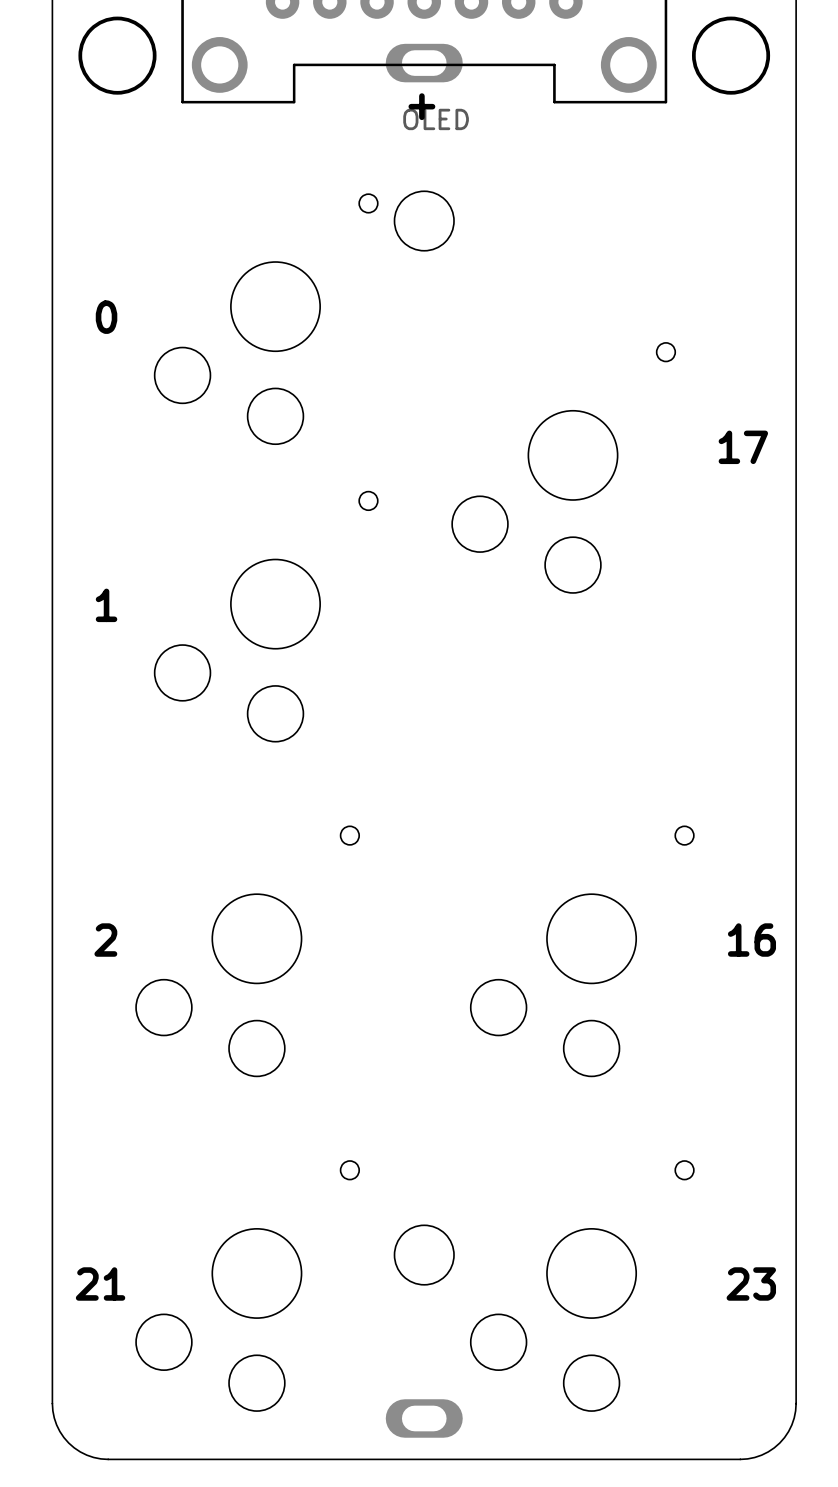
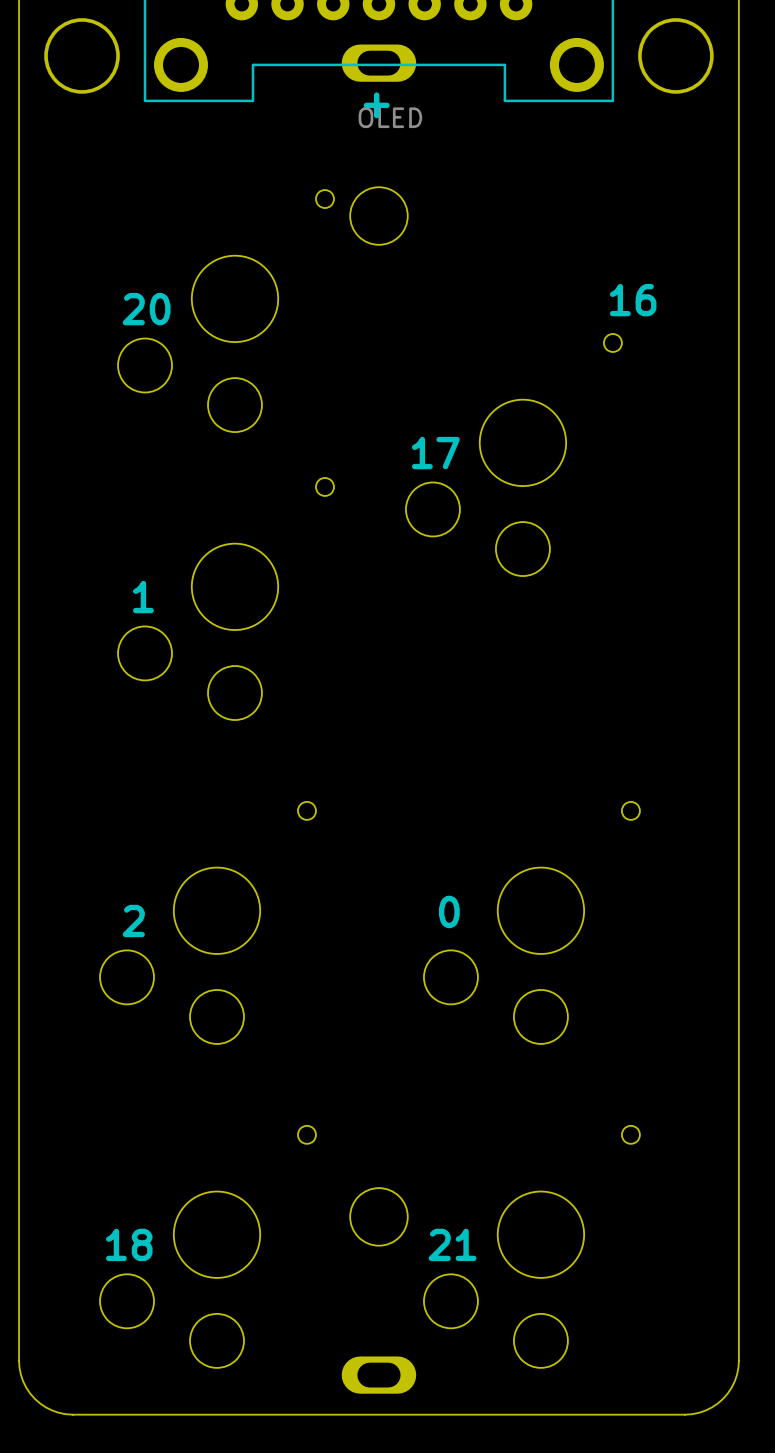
text: none -> 16 (633, 300)
text: 0 (106, 317) -> none
text: none -> 20 (146, 309)
text position: 17 (743, 447) -> 17 (435, 453)
text position: 1 (106, 605) -> 1 (143, 597)
text position: 2 (105, 940) -> 2 (133, 920)
text: none -> 0 (449, 911)
text: 16 (751, 940) -> none
text position: 21 (100, 1284) -> 21 (452, 1244)
text: none -> 18 (129, 1244)
text: 23 (751, 1284) -> none

